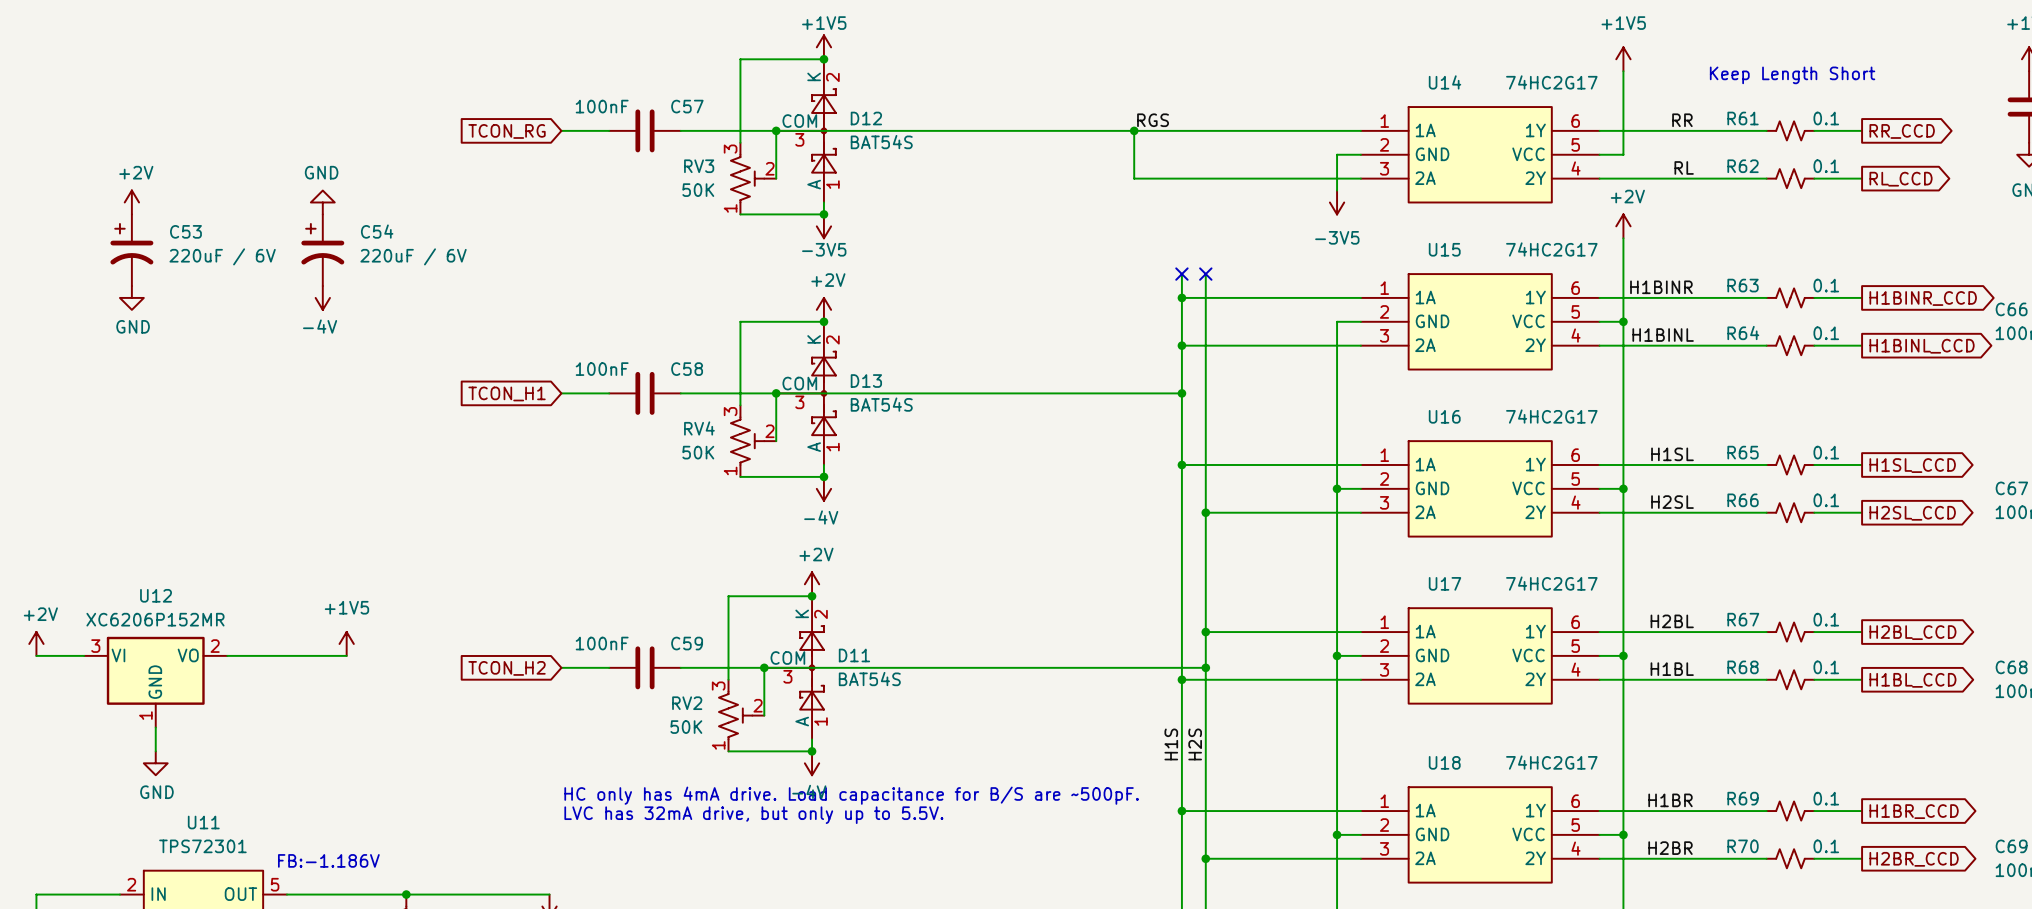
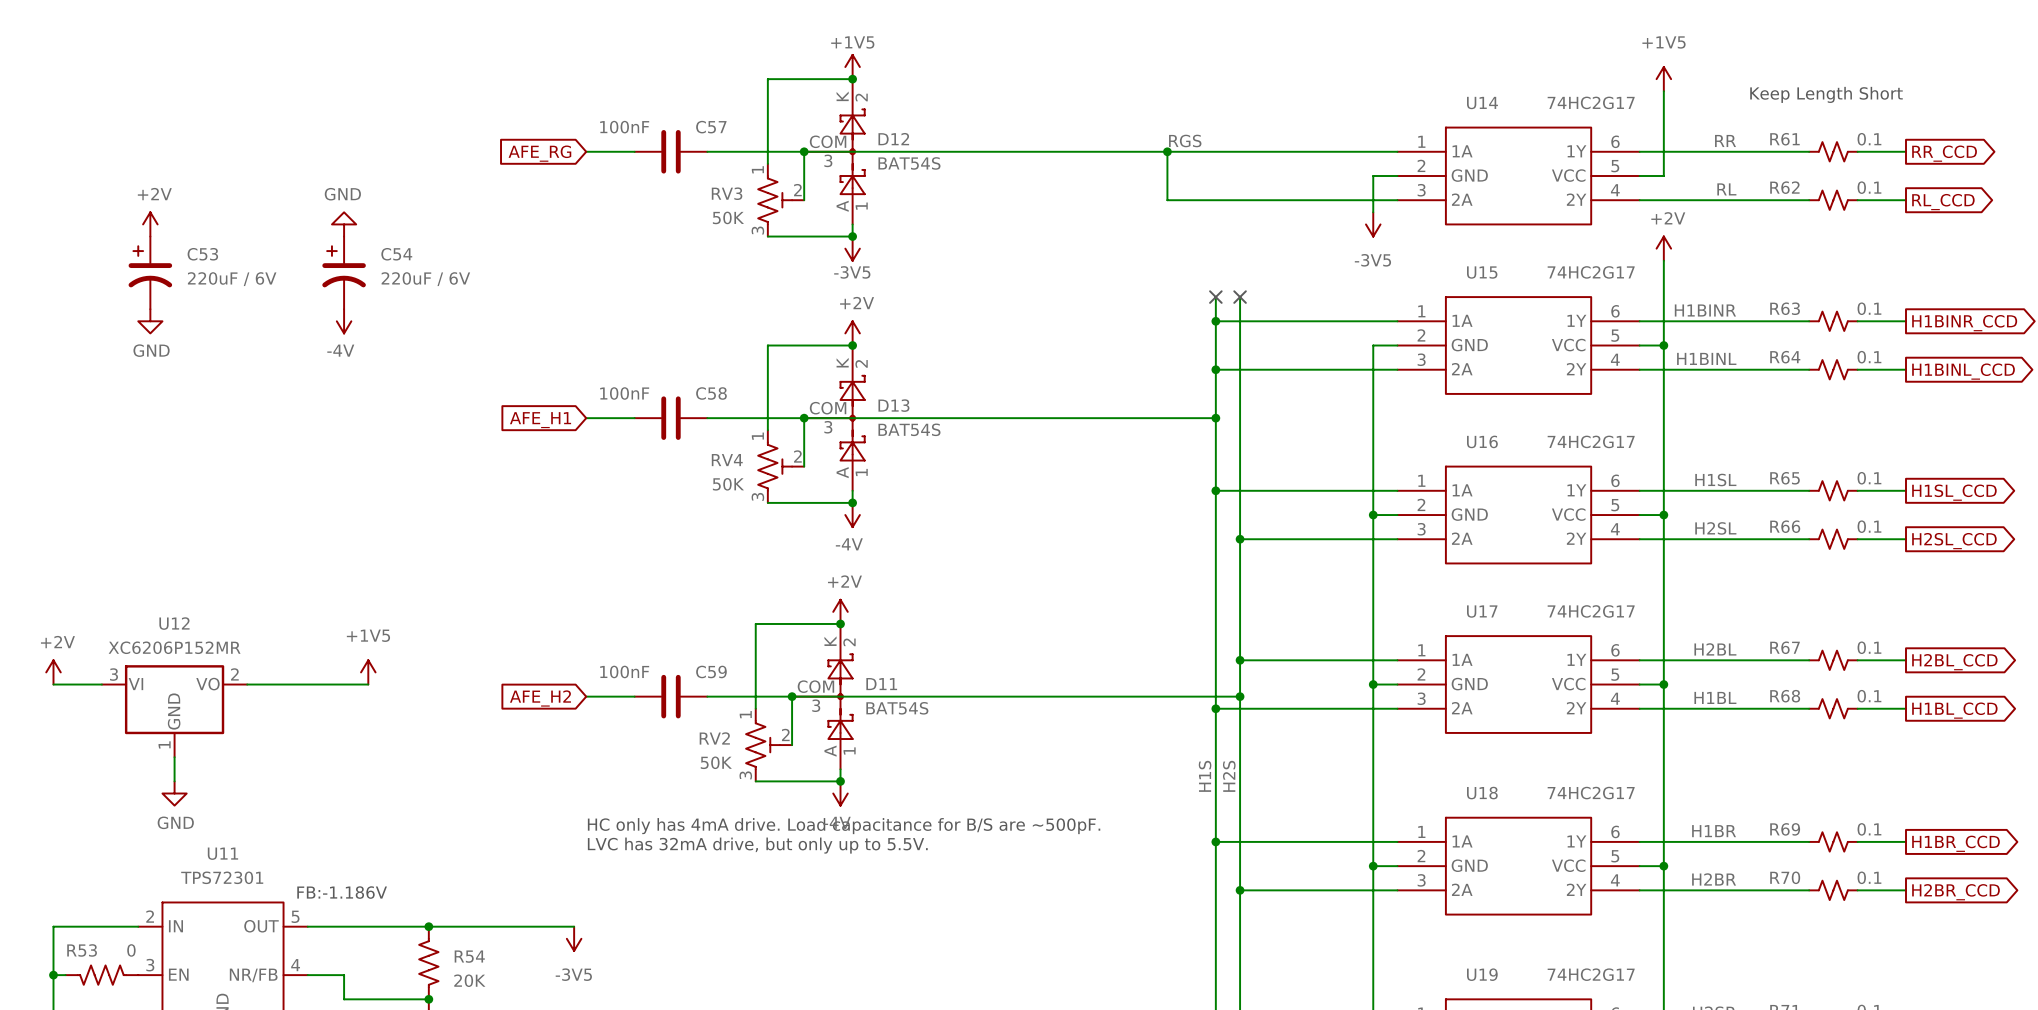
global label: TCON_RG (507, 131) -> AFE_RG (539, 153)
RV3 flip: as is (747, 178) -> up-down (775, 200)
global label: TCON_H1 (507, 393) -> AFE_H1 (540, 420)
RV4 flip: as is (747, 441) -> up-down (775, 466)
global label: TCON_H2 (507, 668) -> AFE_H2 (540, 698)
RV2 flip: as is (735, 715) -> up-down (763, 745)

